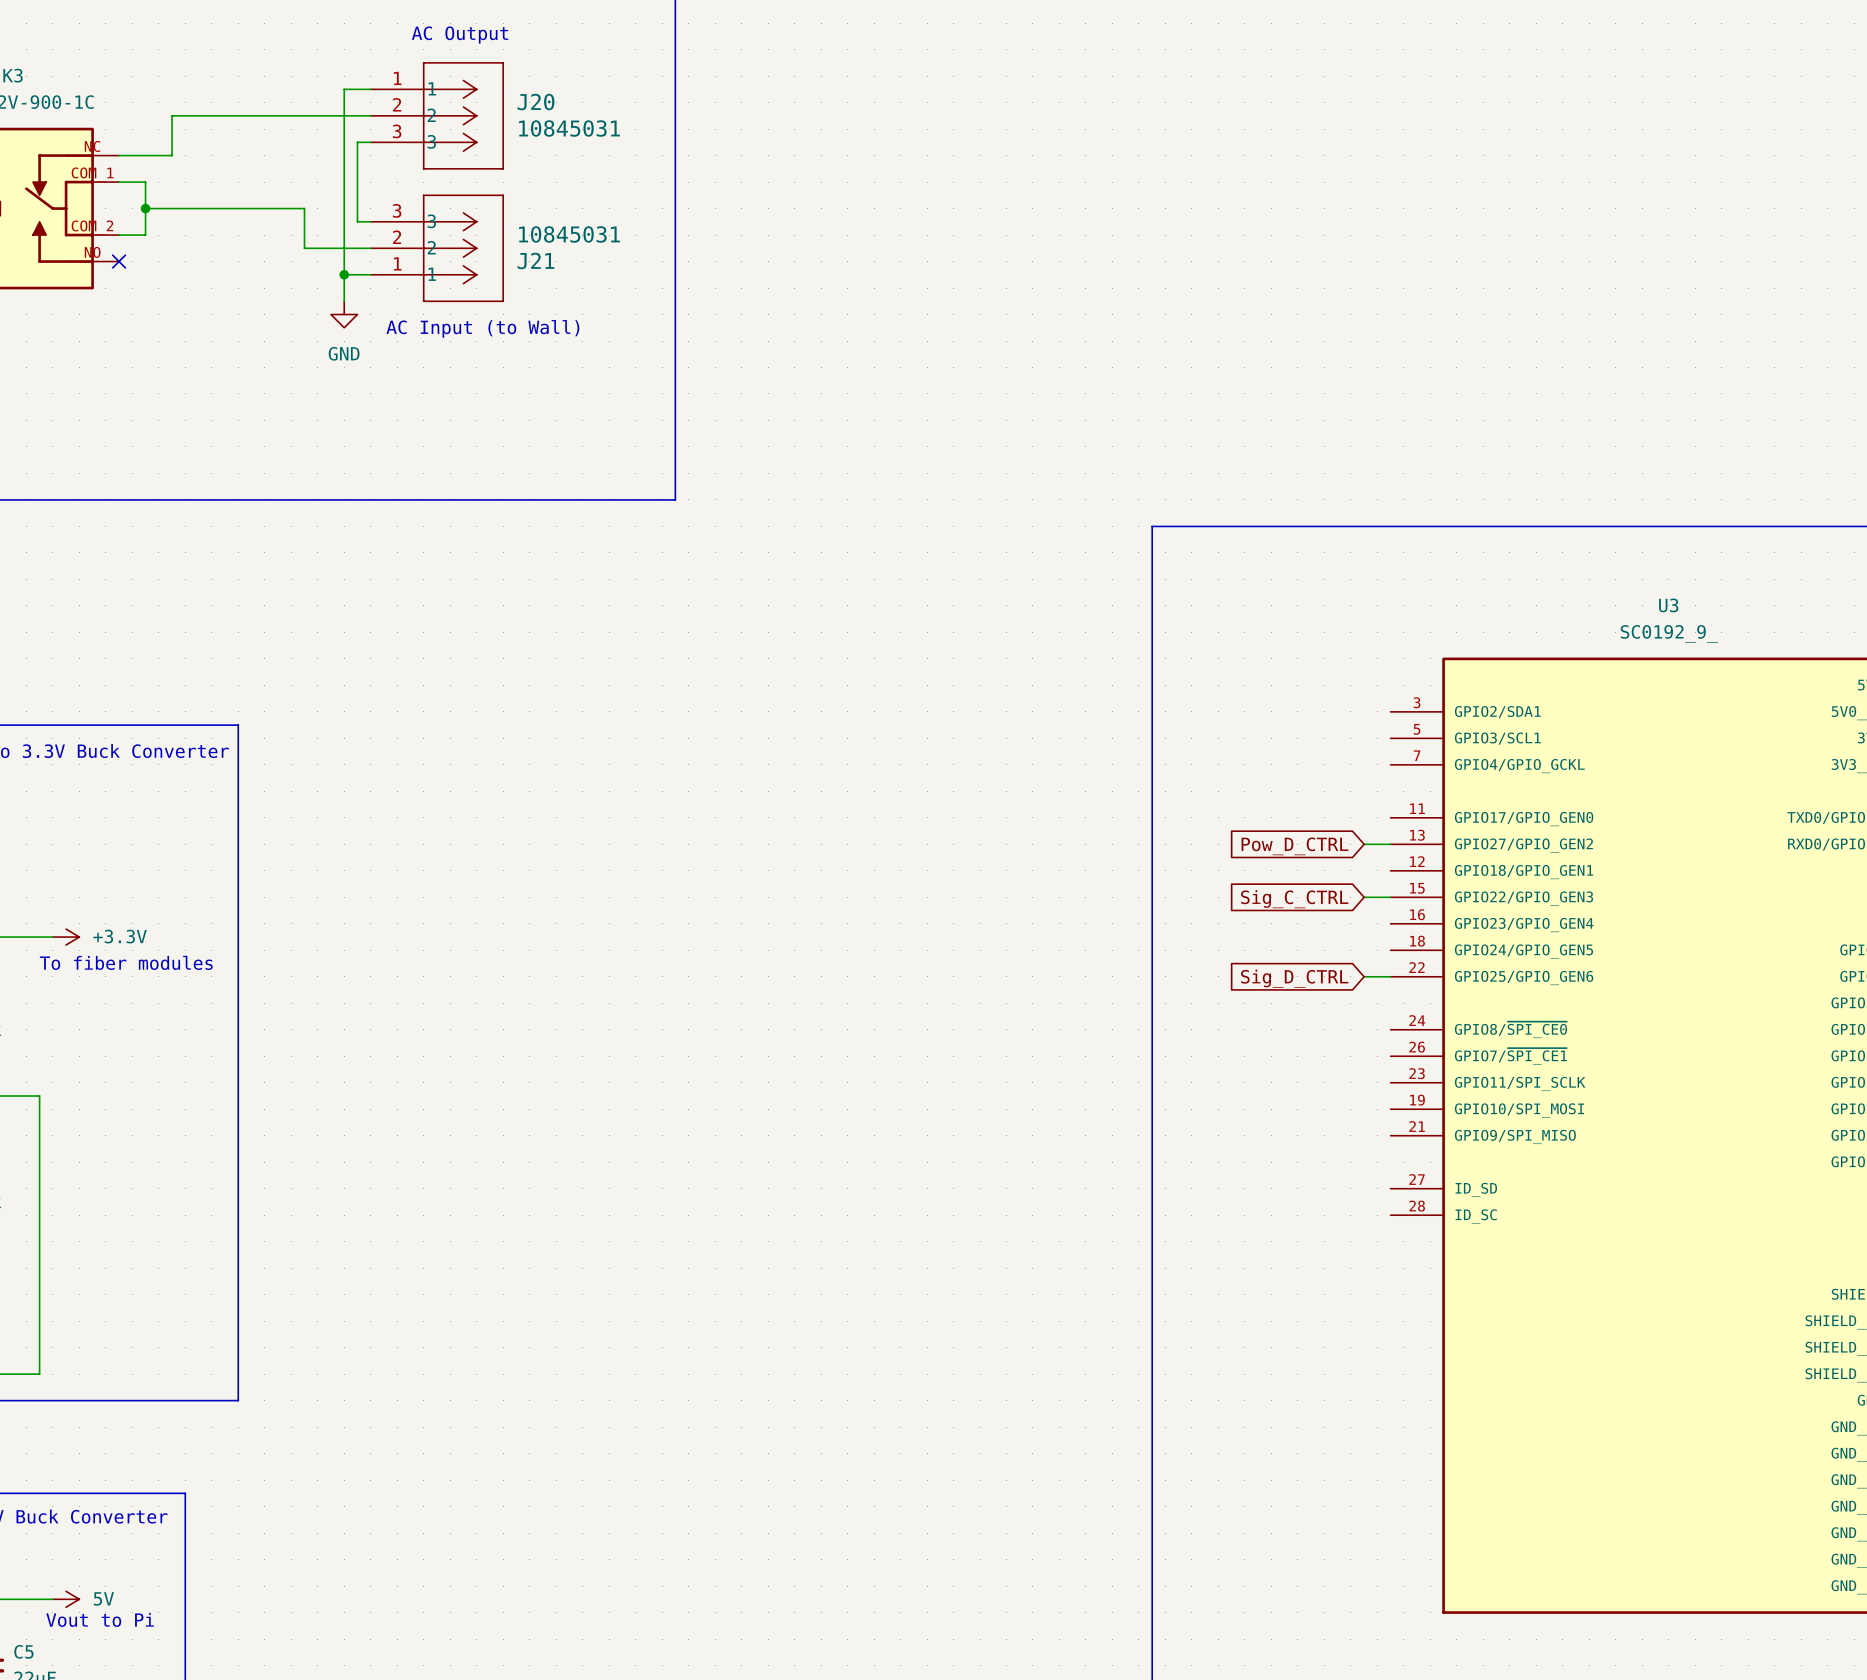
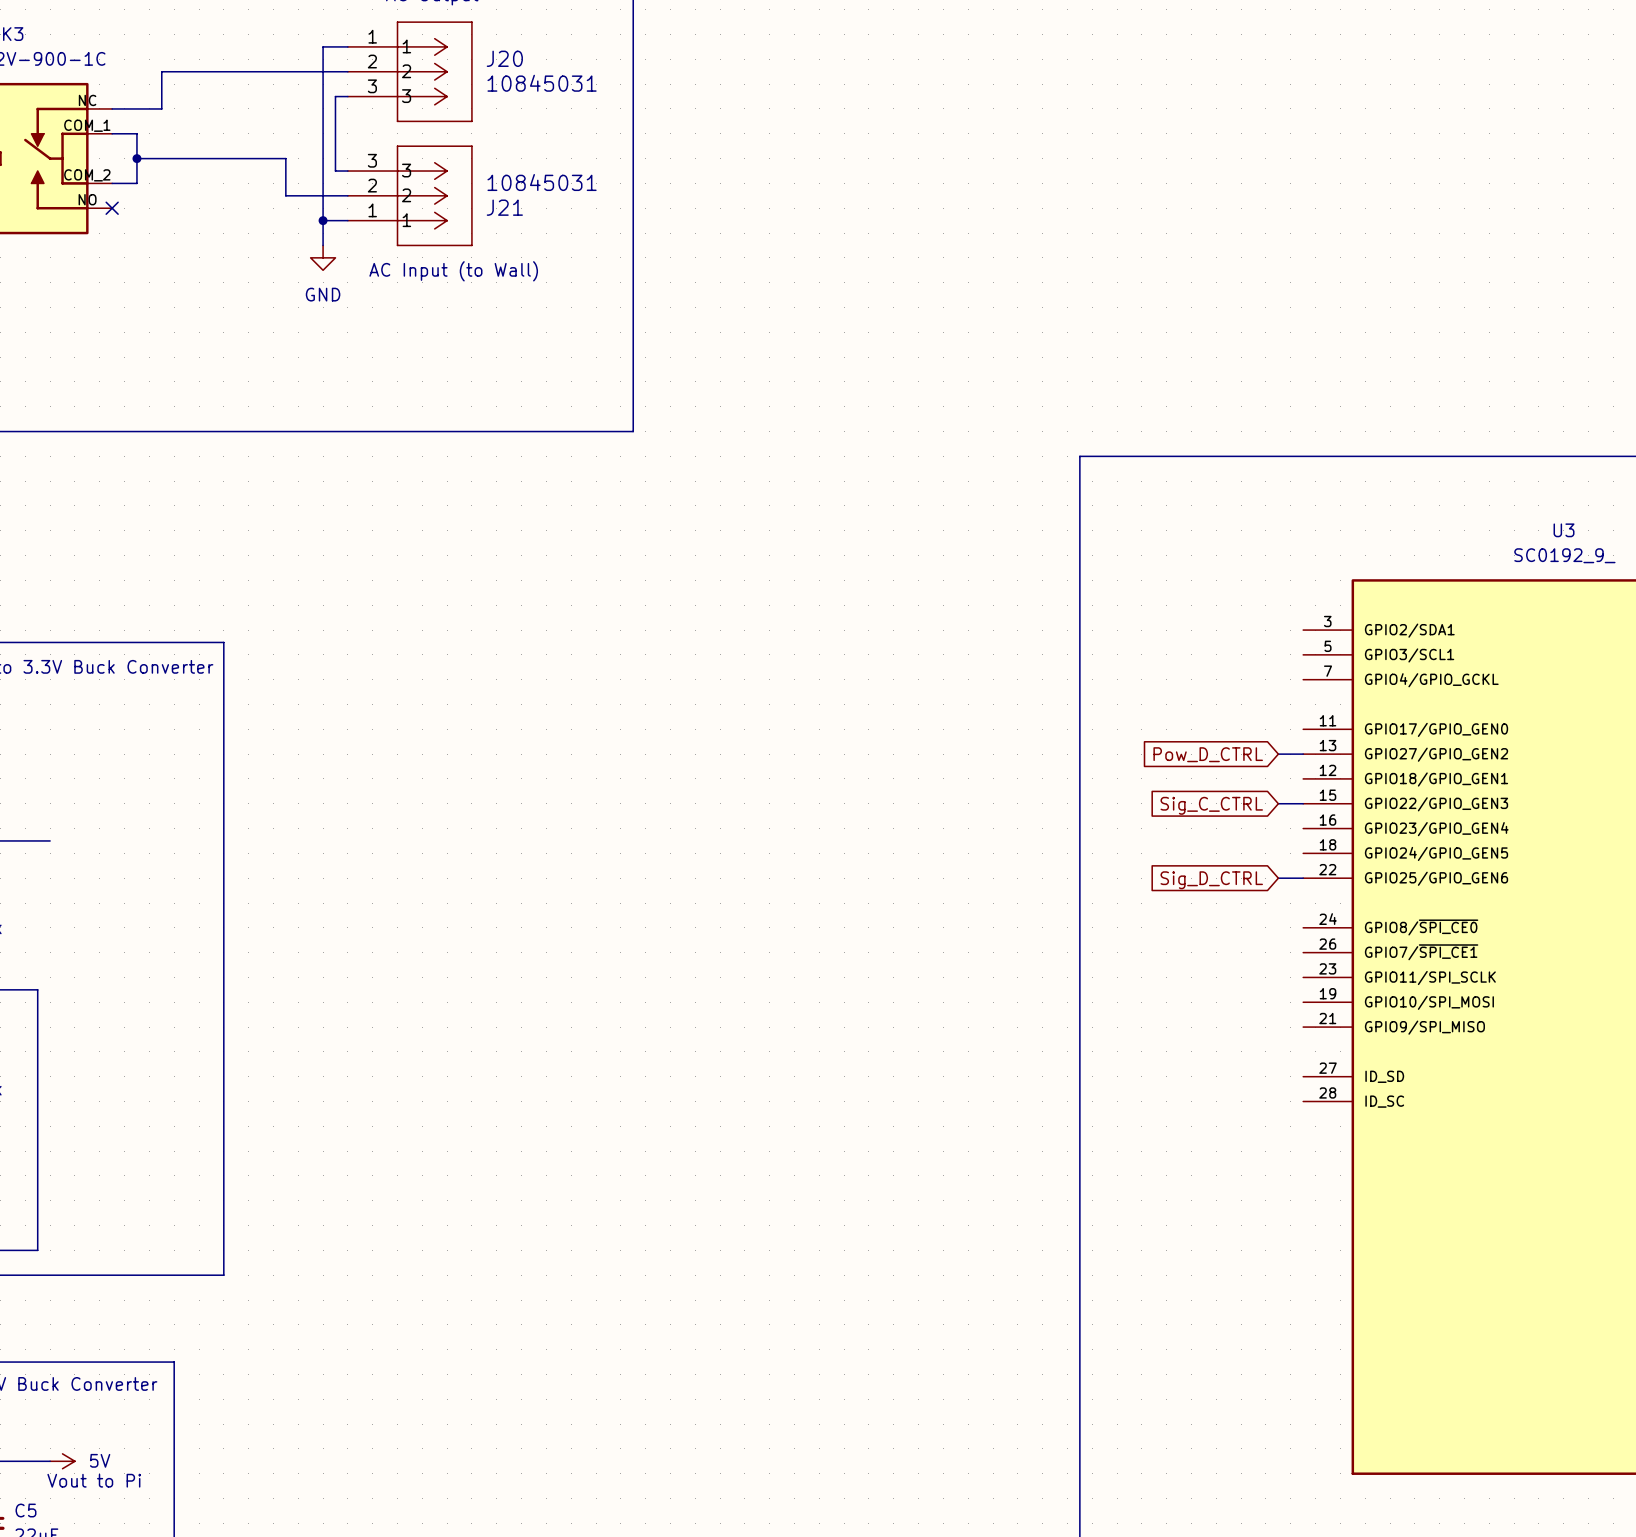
power symbol: +3.3V (66, 937) -> none
text: To fiber modules (126, 962) -> none

